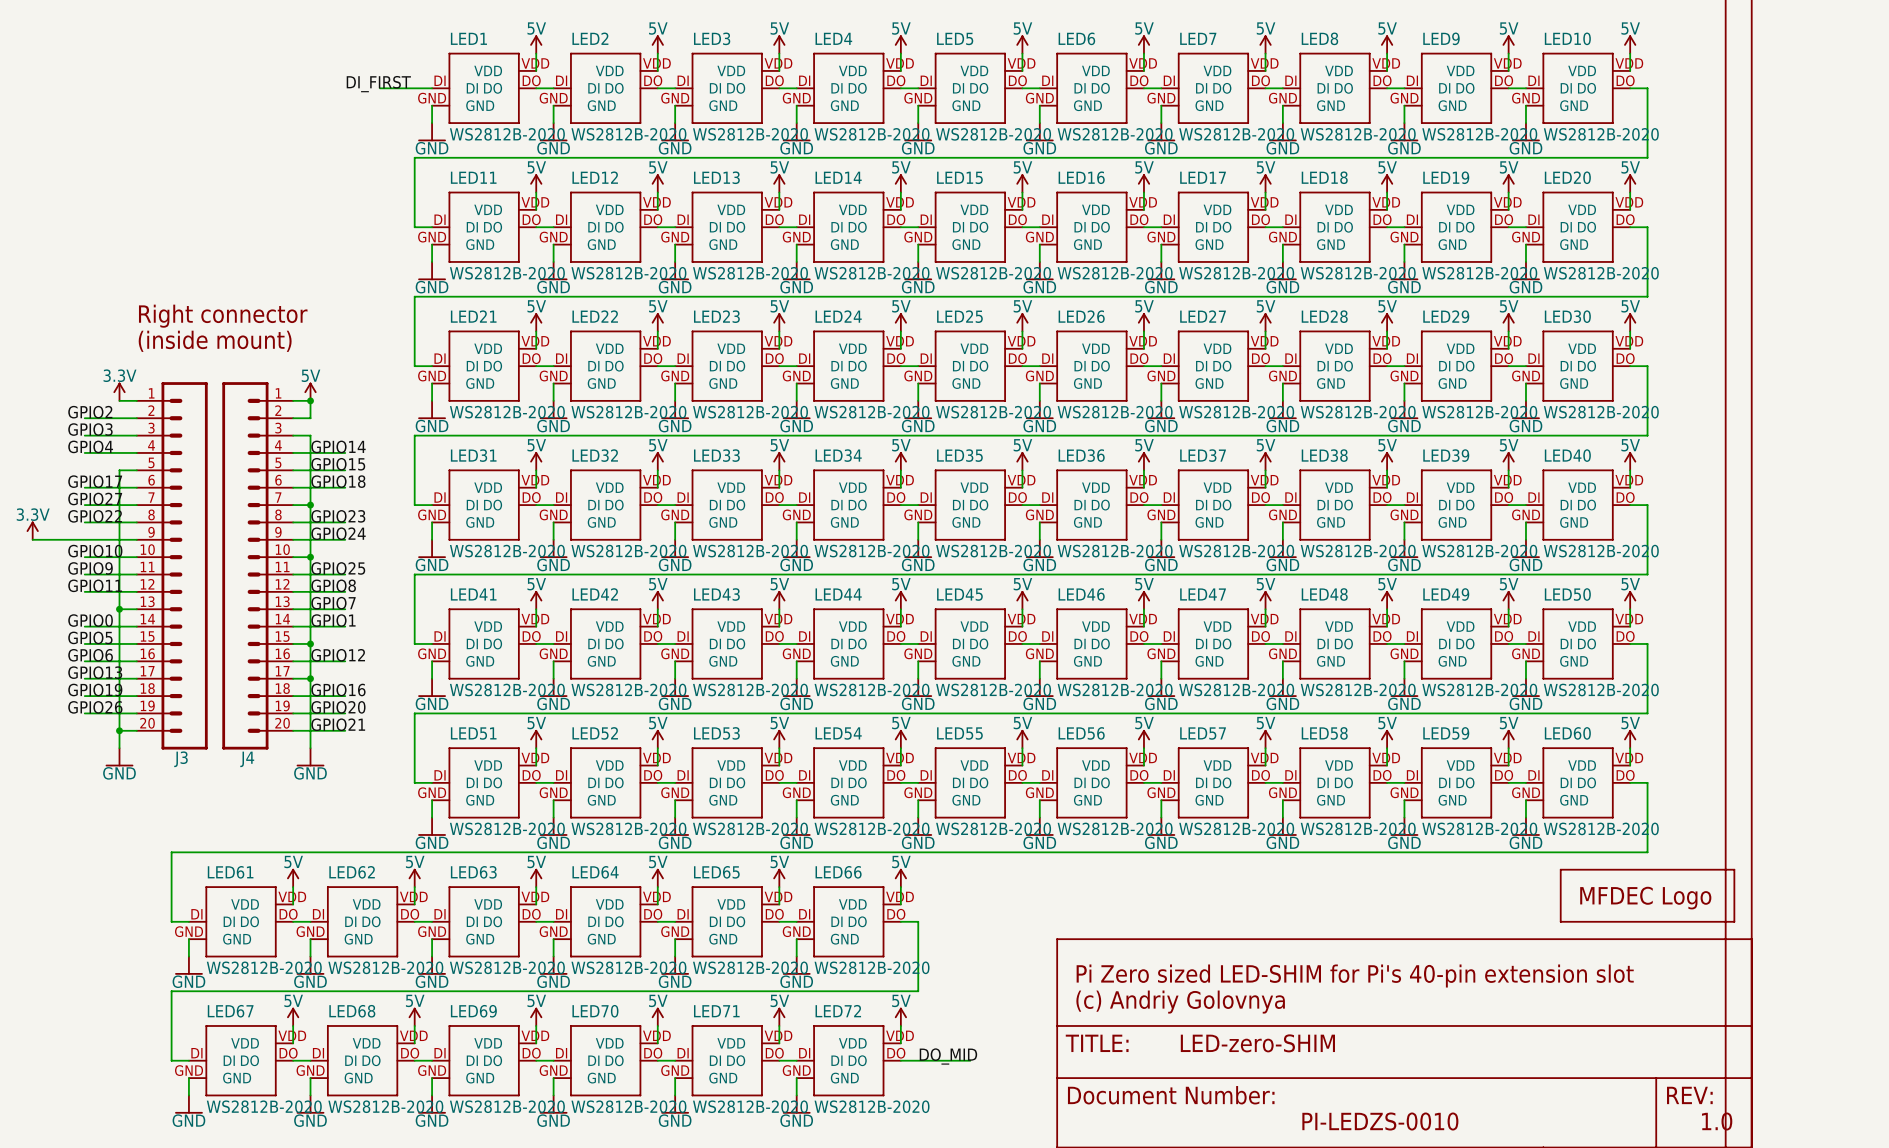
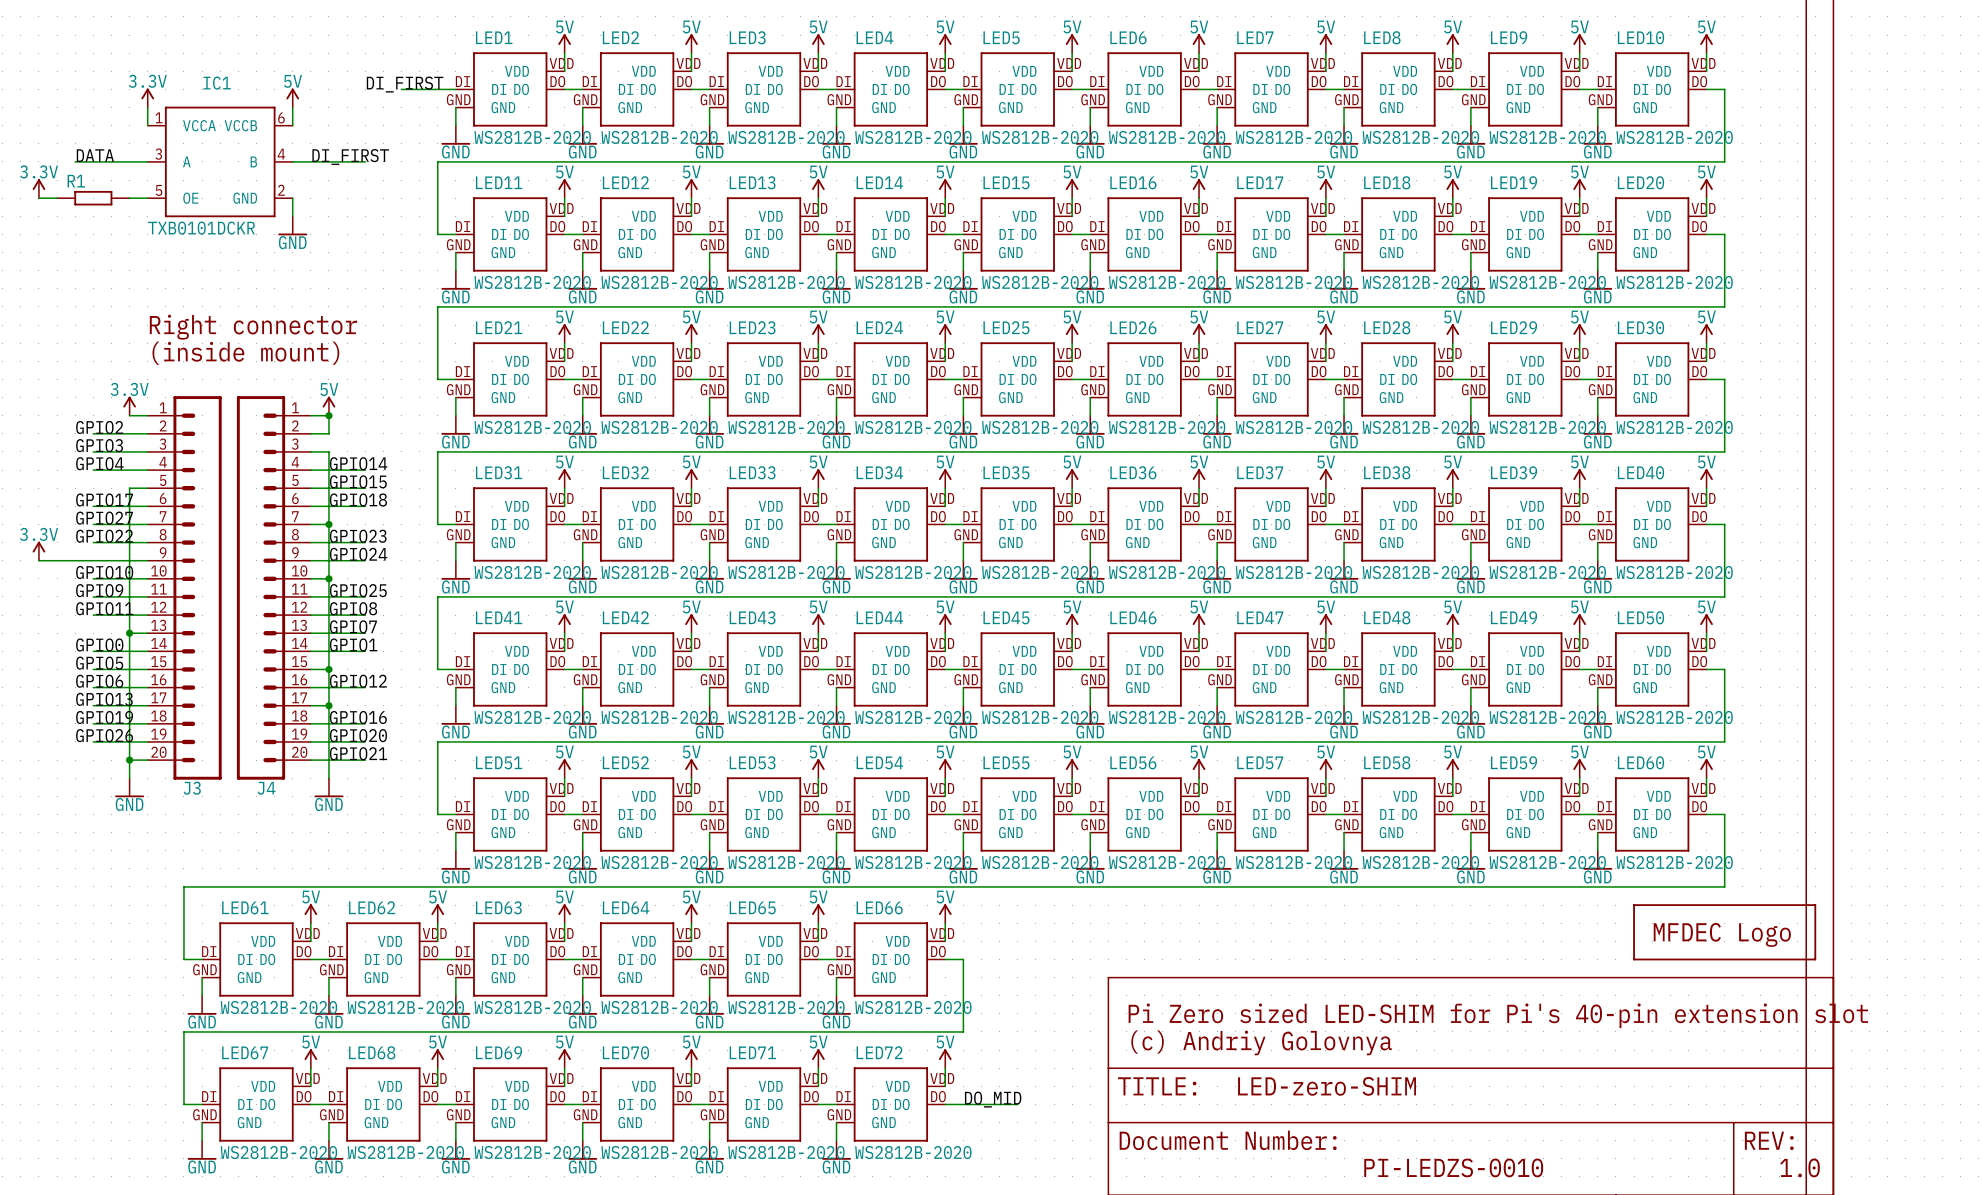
power symbol: none -> 3.3V (147, 98)
power symbol: none -> 5V (292, 98)
wire: none -> (147, 107) (147, 125)
wire: none -> (292, 107) (292, 125)
label: none -> DATA (95, 155)
label: none -> DI_FIRST (350, 157)
wire: none -> (75, 161) (147, 161)
IC1: none -> TXB0101DCKR (220, 161)
wire: none -> (292, 161) (365, 161)
power symbol: none -> 3.3V (38, 188)
wire: none -> (38, 198) (57, 198)
R1: none -> (93, 198)
wire: none -> (129, 198) (147, 198)
wire: none -> (292, 198) (292, 216)
power symbol: none -> GND (292, 225)

